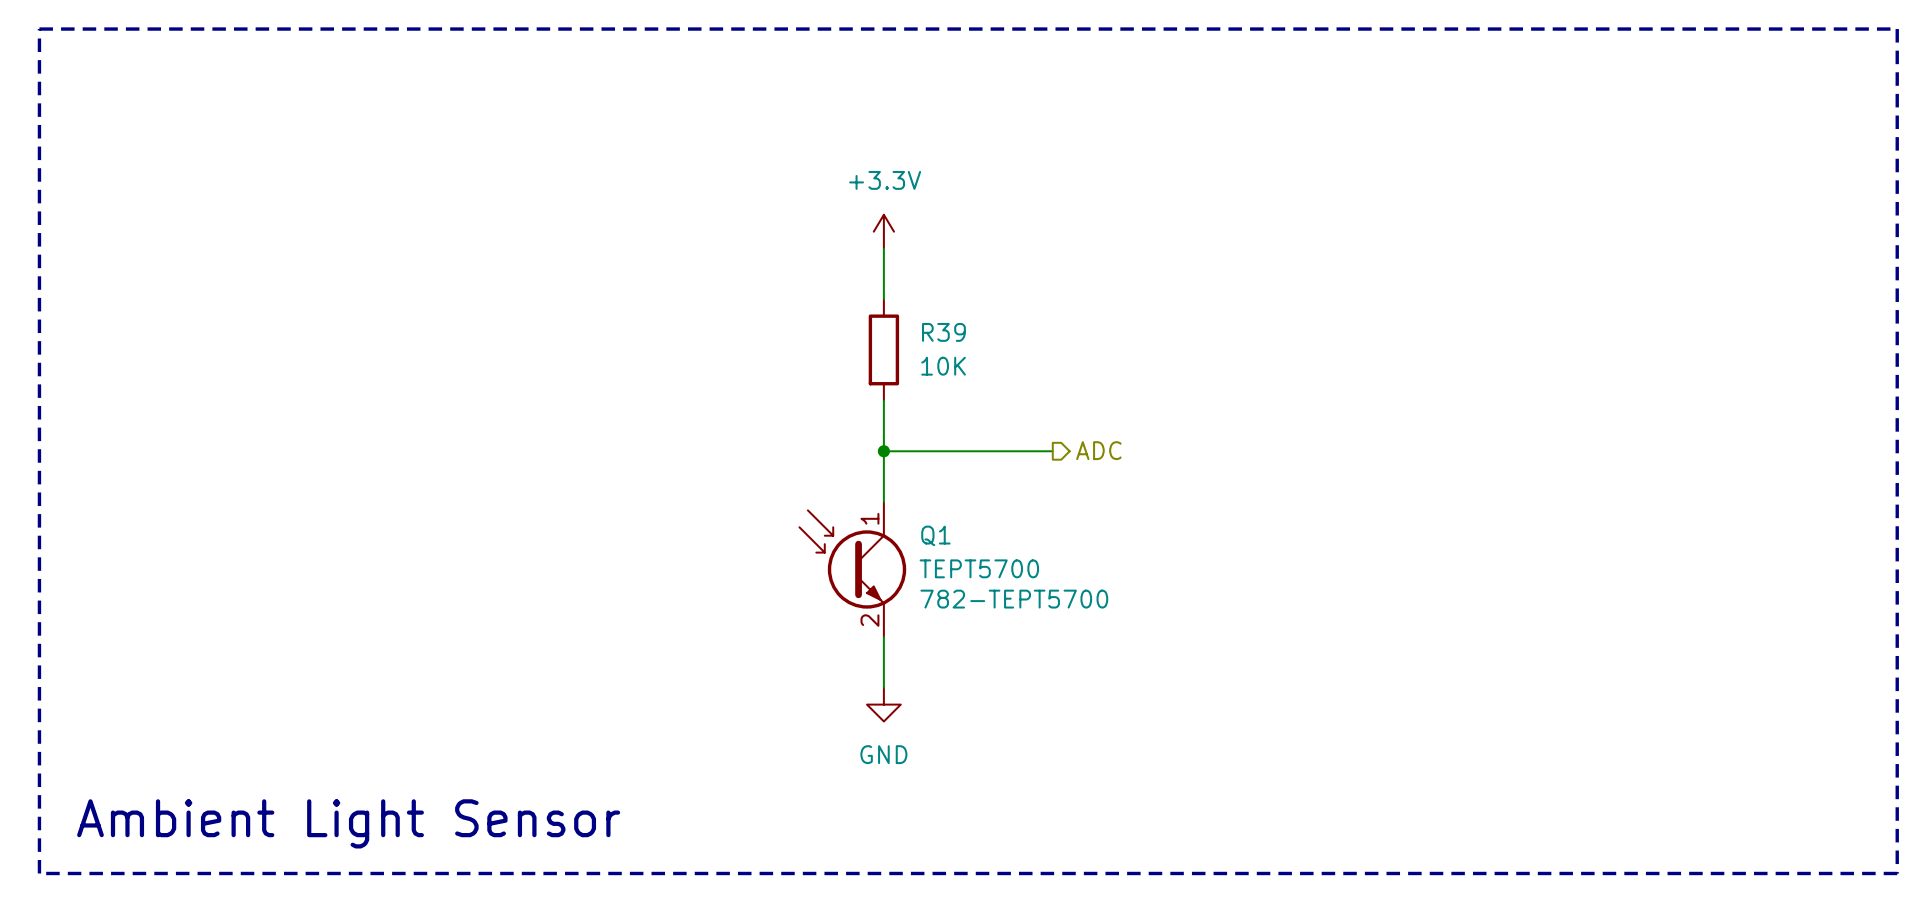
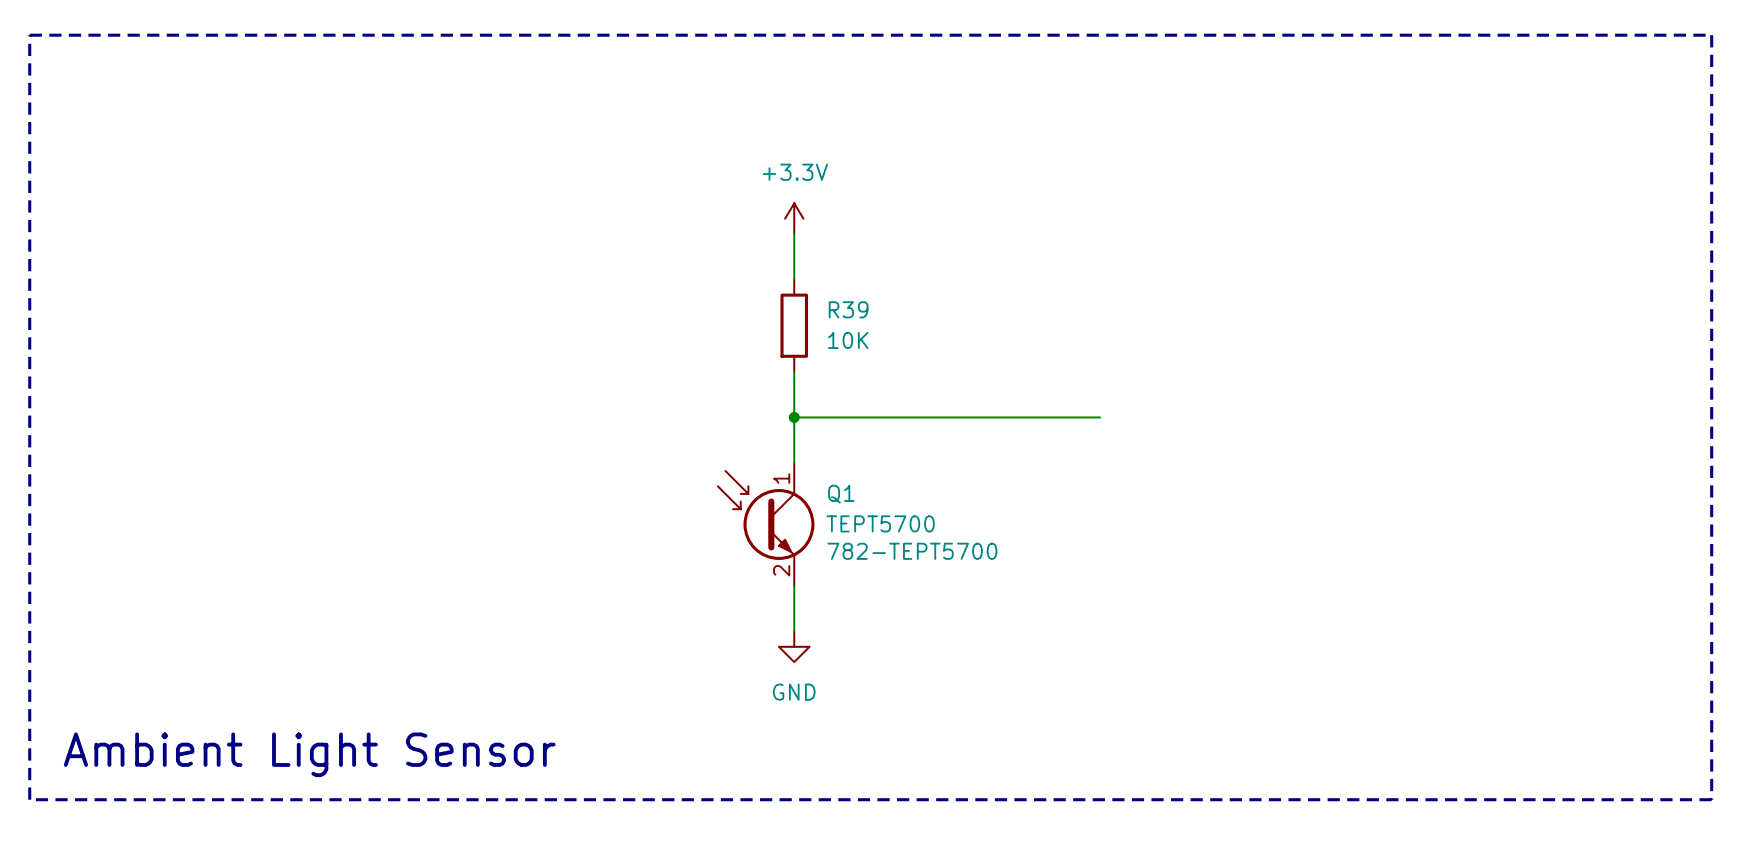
hierarchical label: ADC (1098, 450) -> none
wire: none -> (947, 417) (1100, 417)

